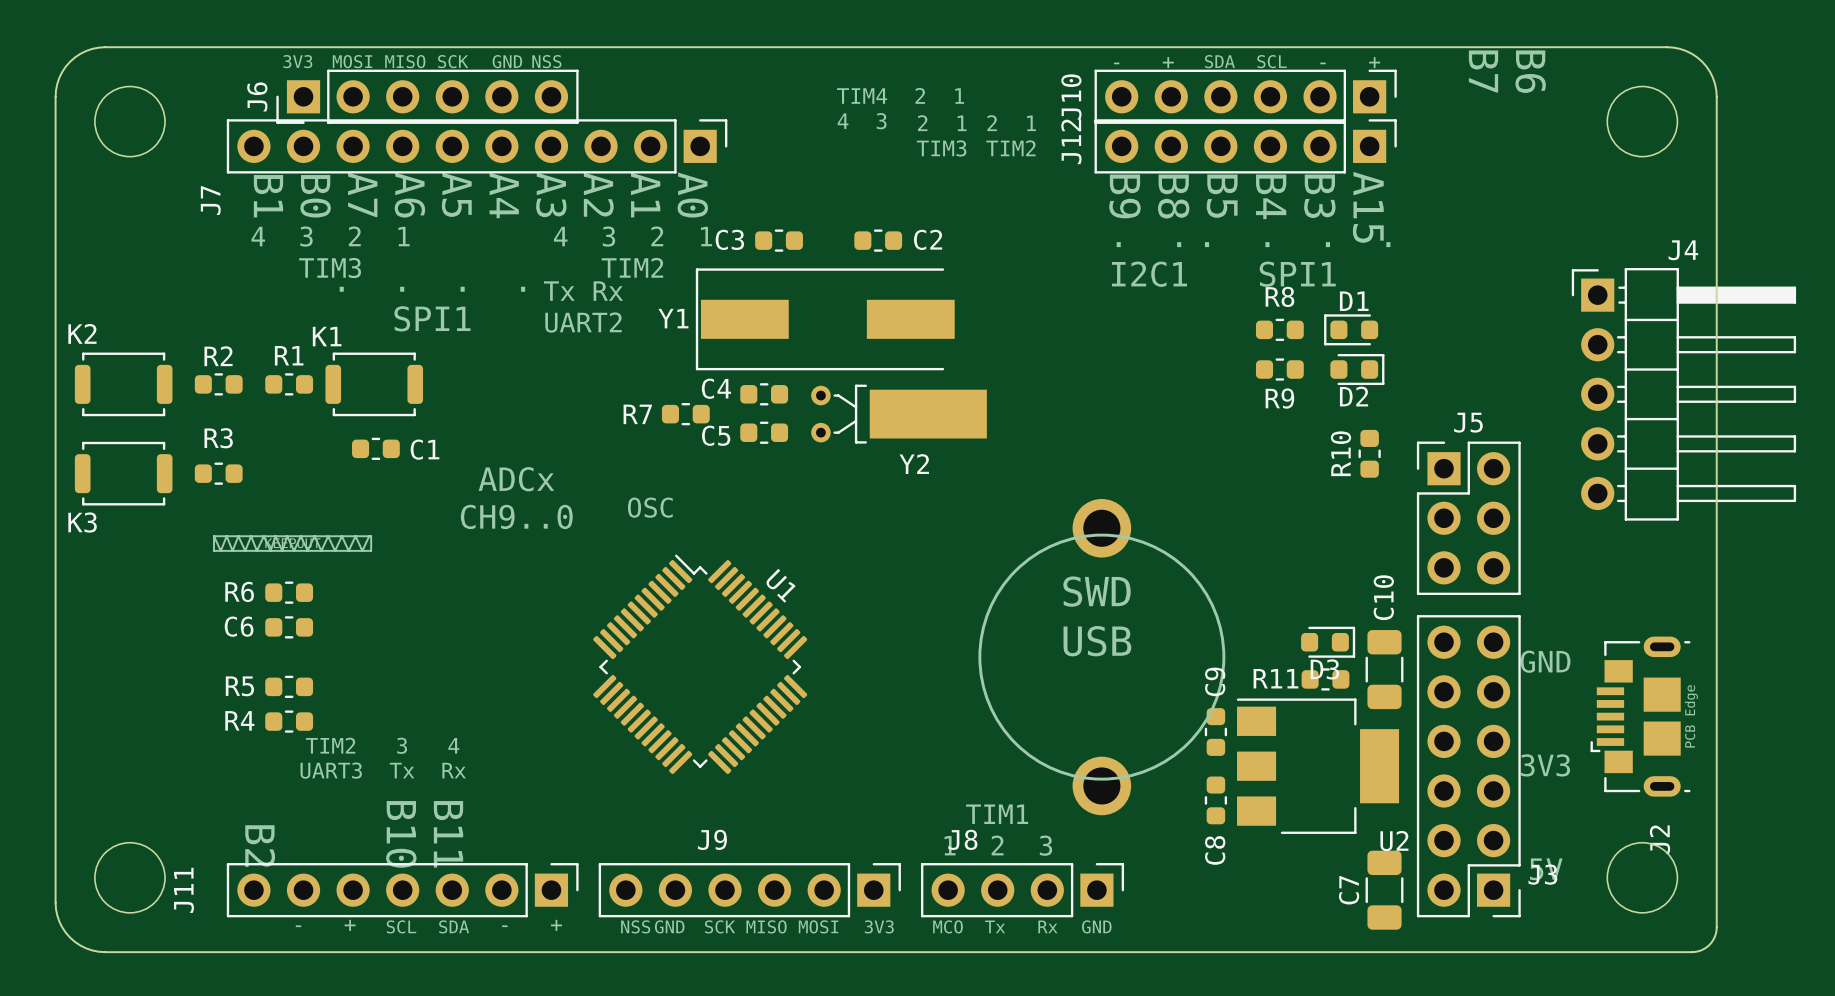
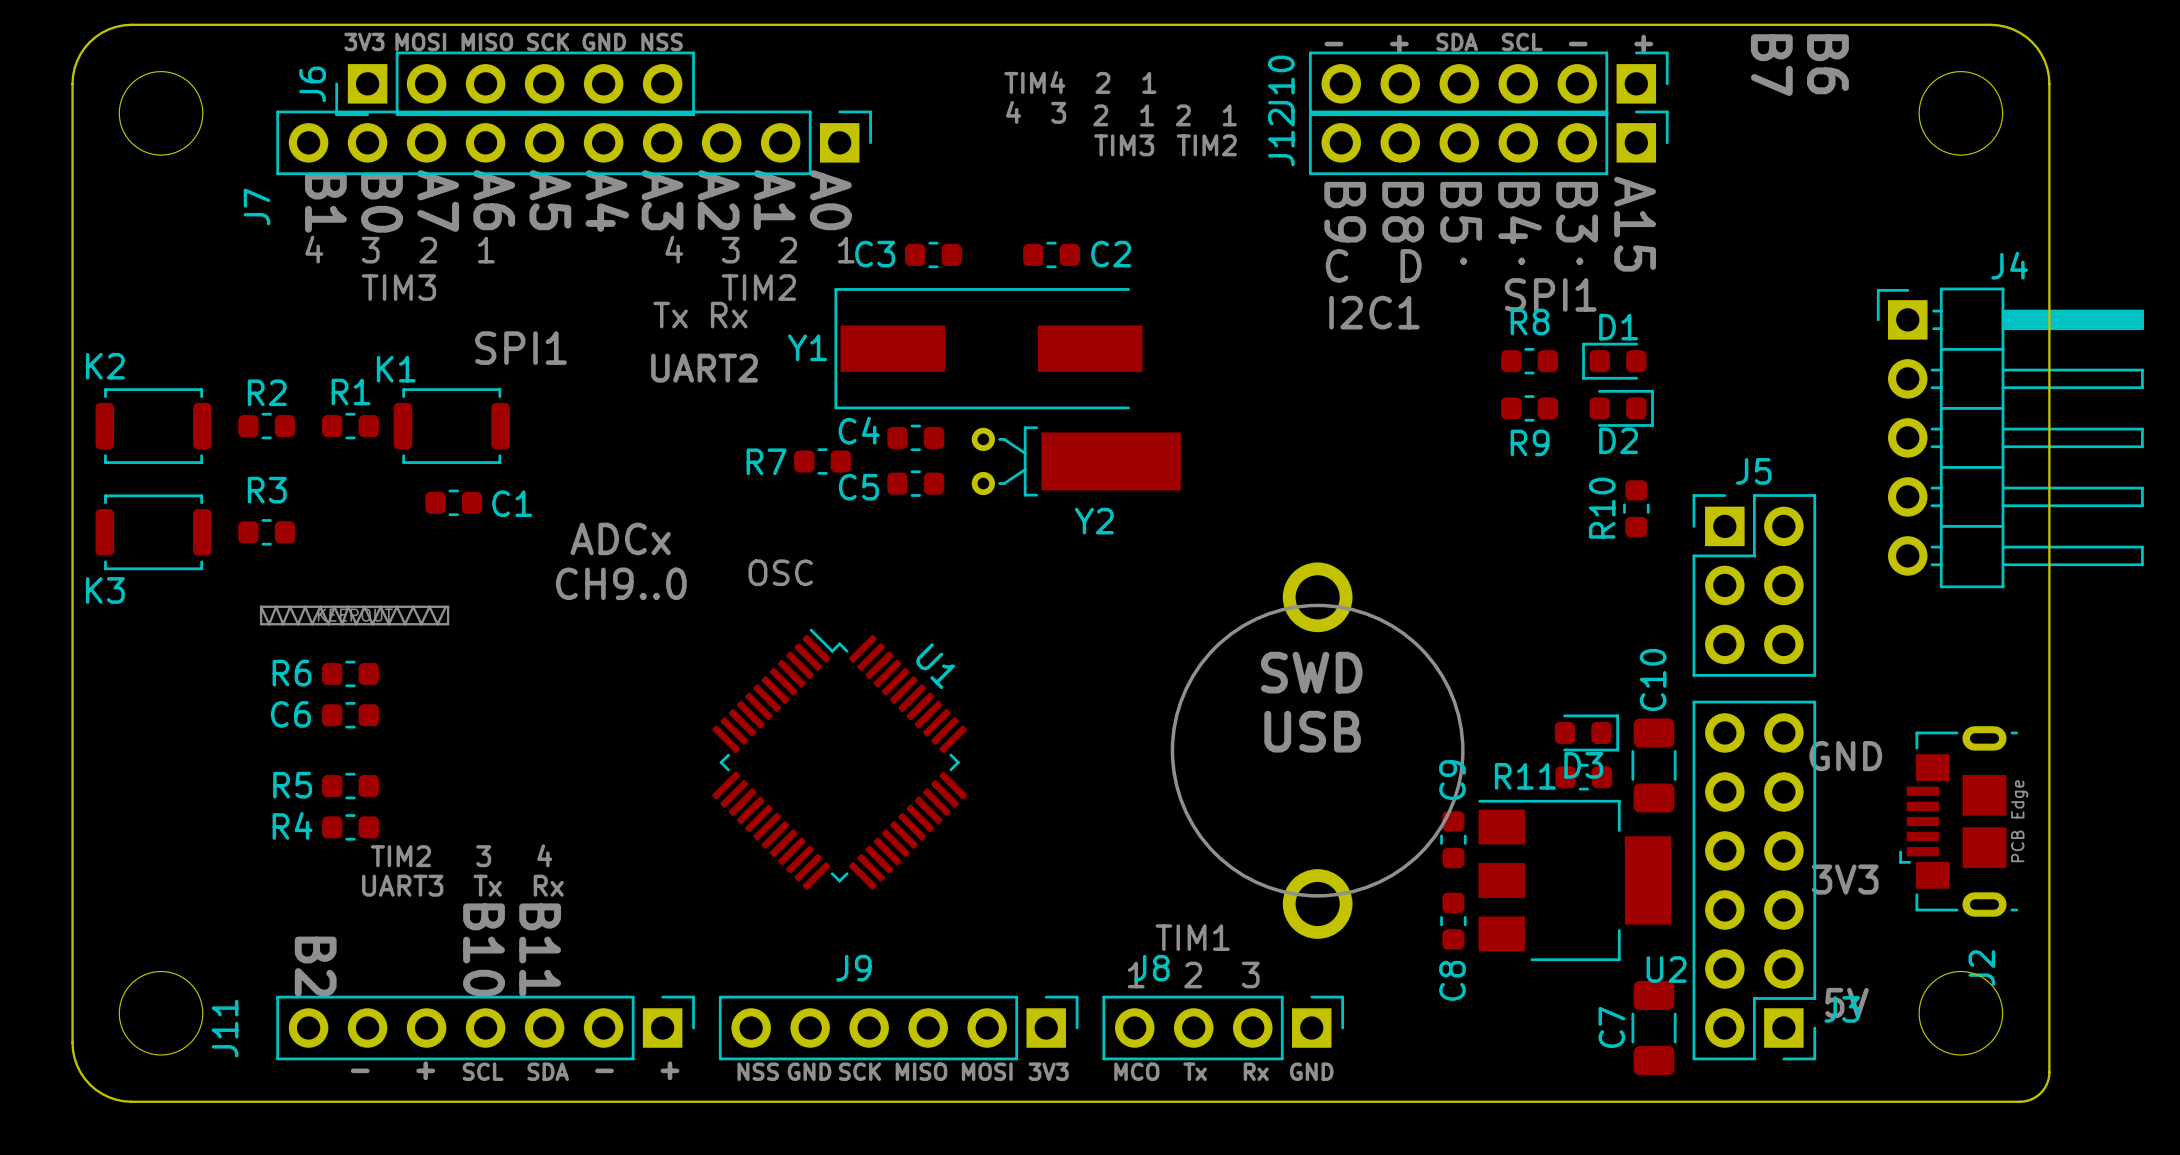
text: . . (1148, 244) -> C D (1373, 265)
text position: I2C1 (1149, 274) -> I2C1 (1374, 312)
text: . . . . (432, 289) -> none
text position: UART2 (583, 322) -> UART2 (704, 368)

